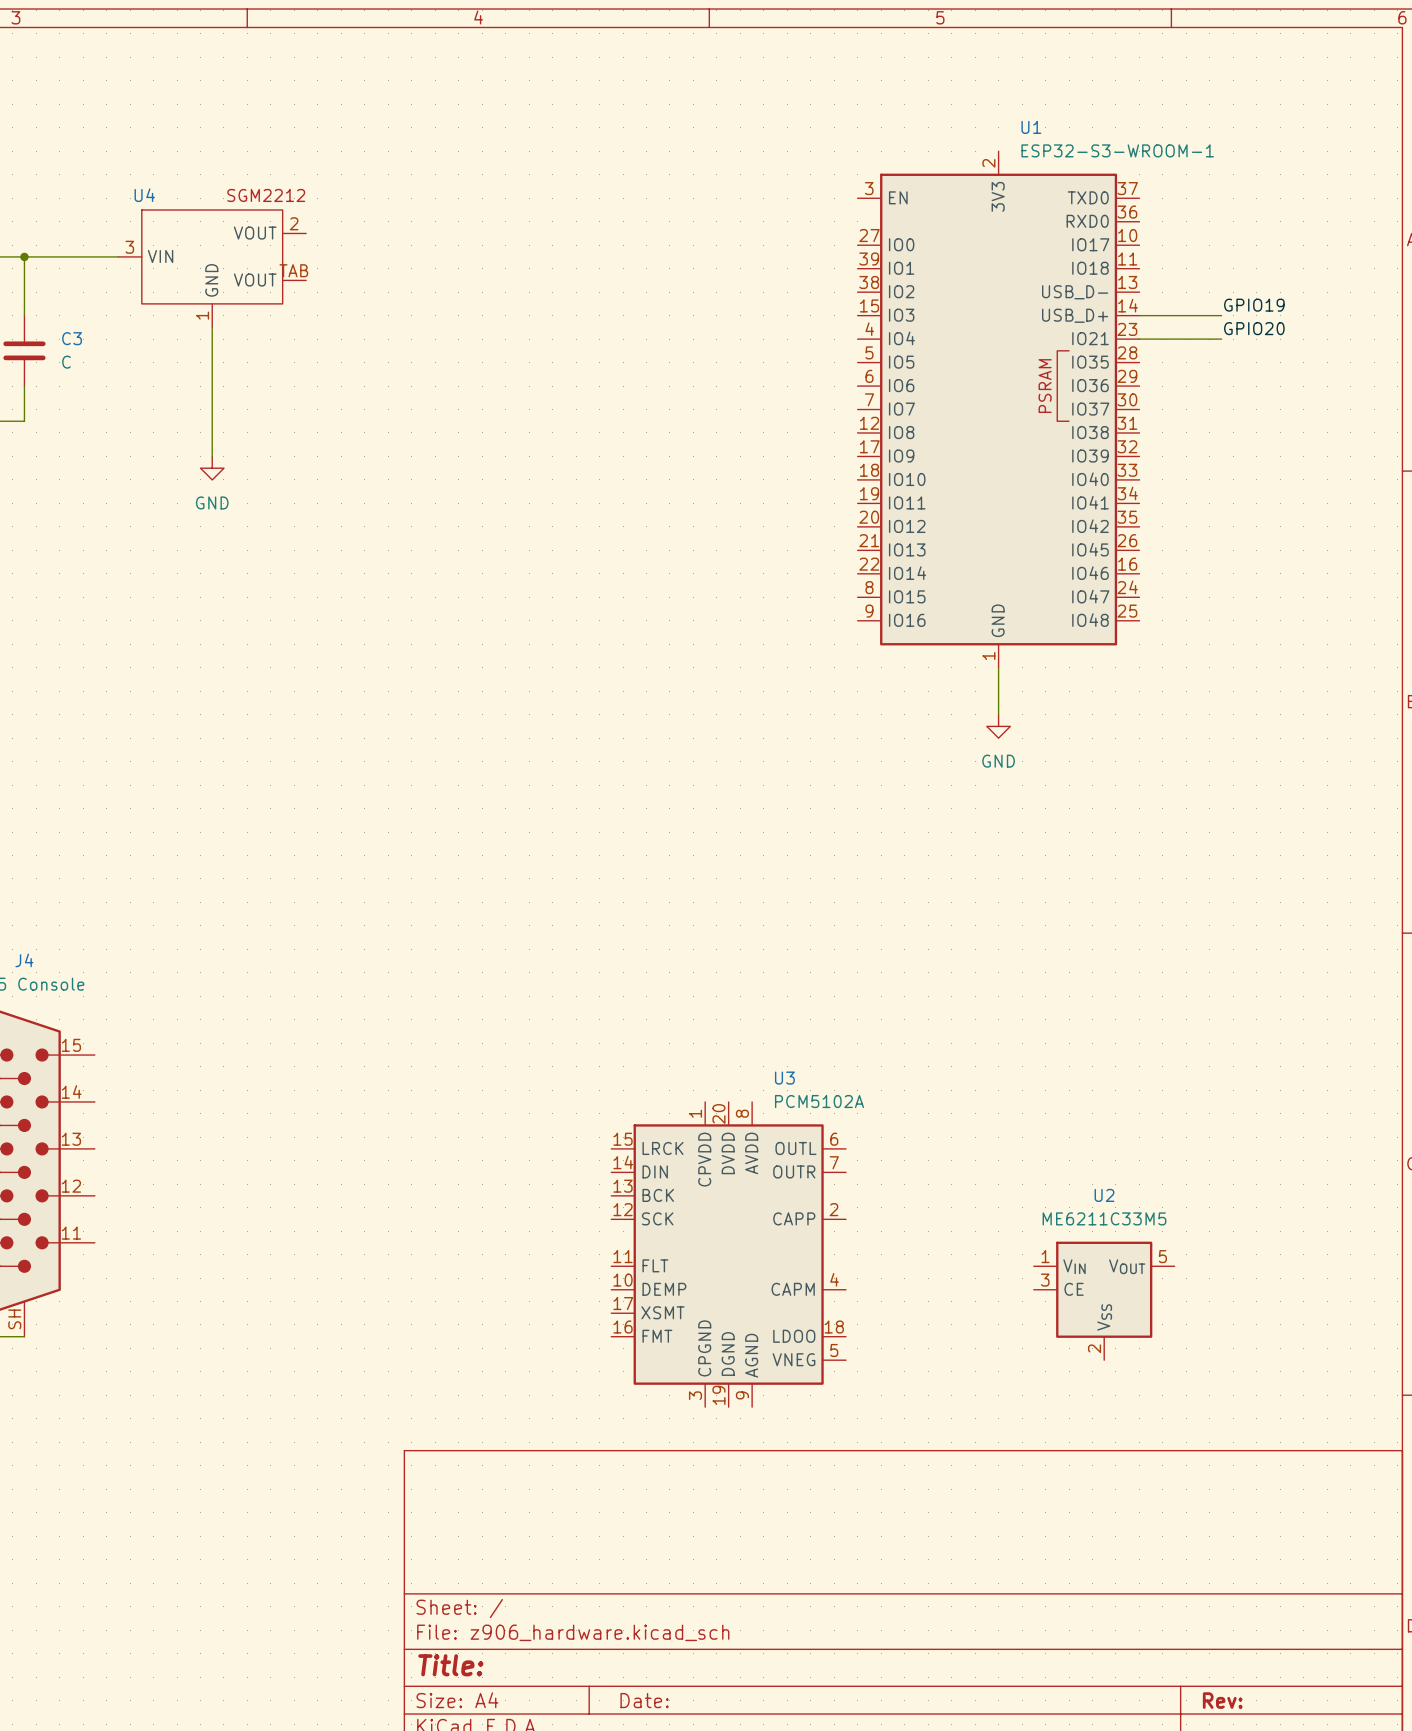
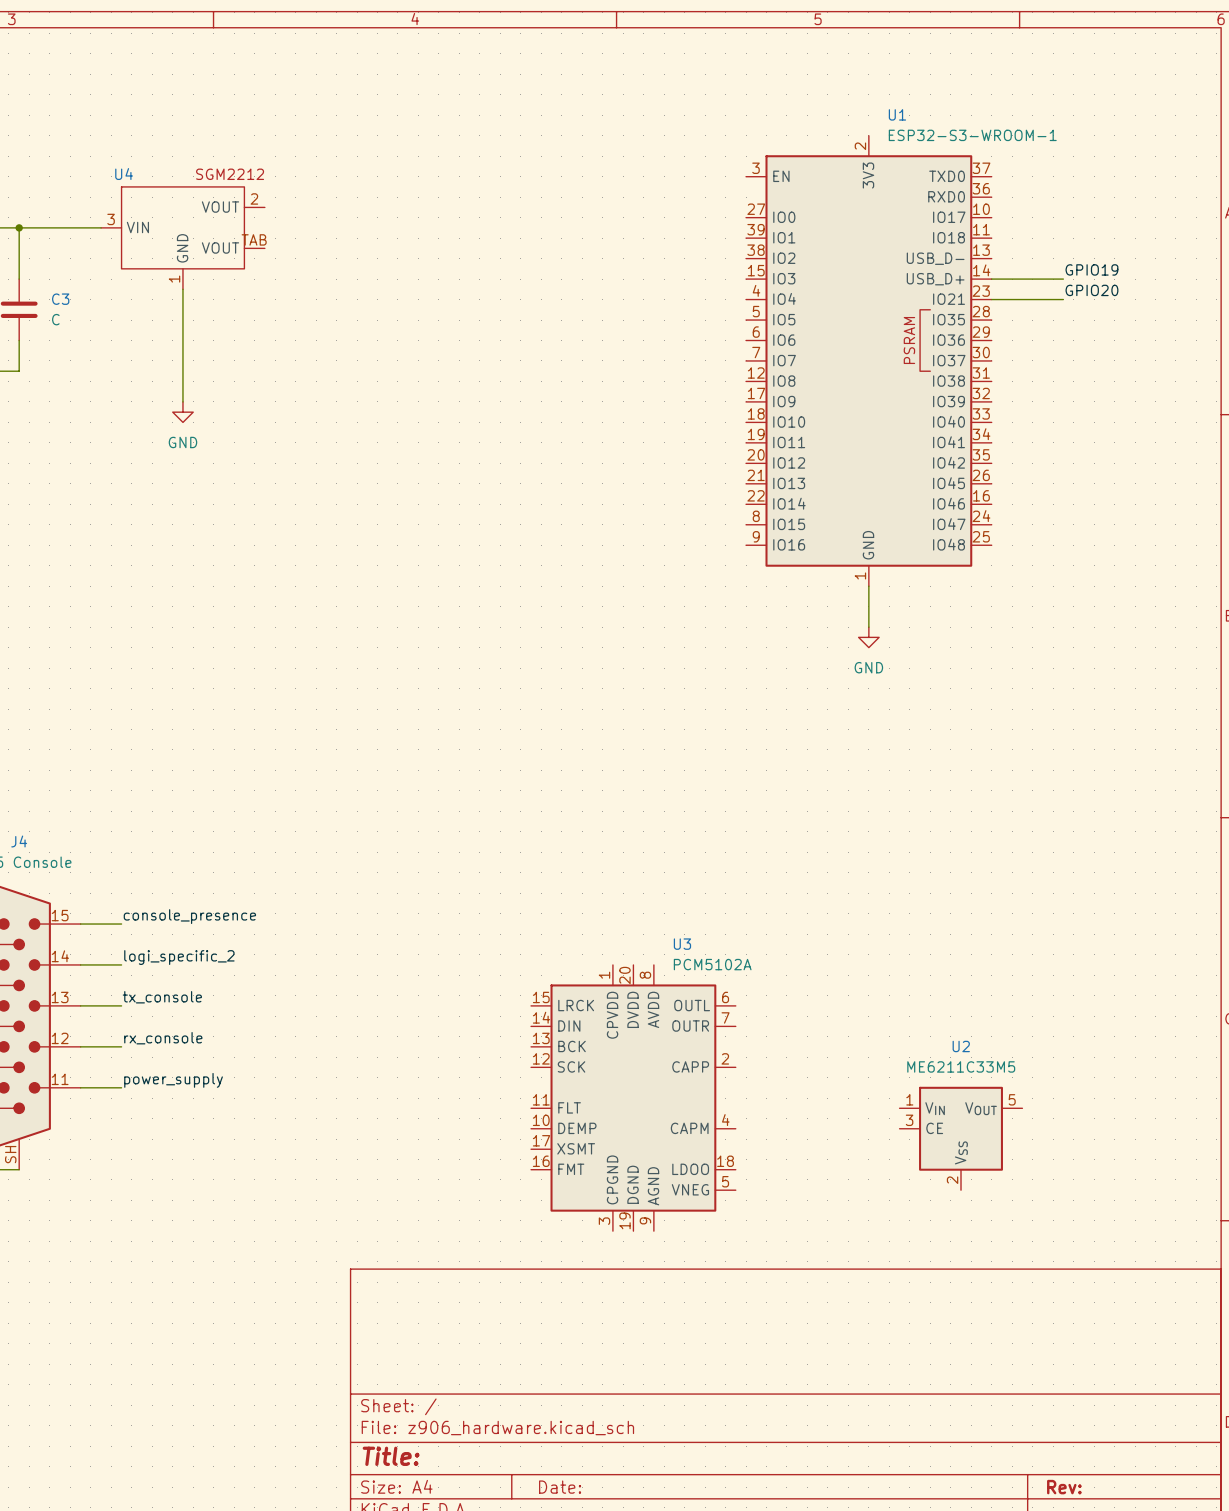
label: none -> console_presence (189, 916)
wire: none -> (80, 924) (121, 924)
label: none -> logi_specific_2 (179, 957)
wire: none -> (80, 964) (121, 964)
label: none -> tx_console (162, 997)
wire: none -> (80, 1005) (121, 1005)
label: none -> rx_console (163, 1038)
wire: none -> (80, 1046) (121, 1046)
label: none -> power_supply (173, 1080)
wire: none -> (80, 1087) (121, 1087)

